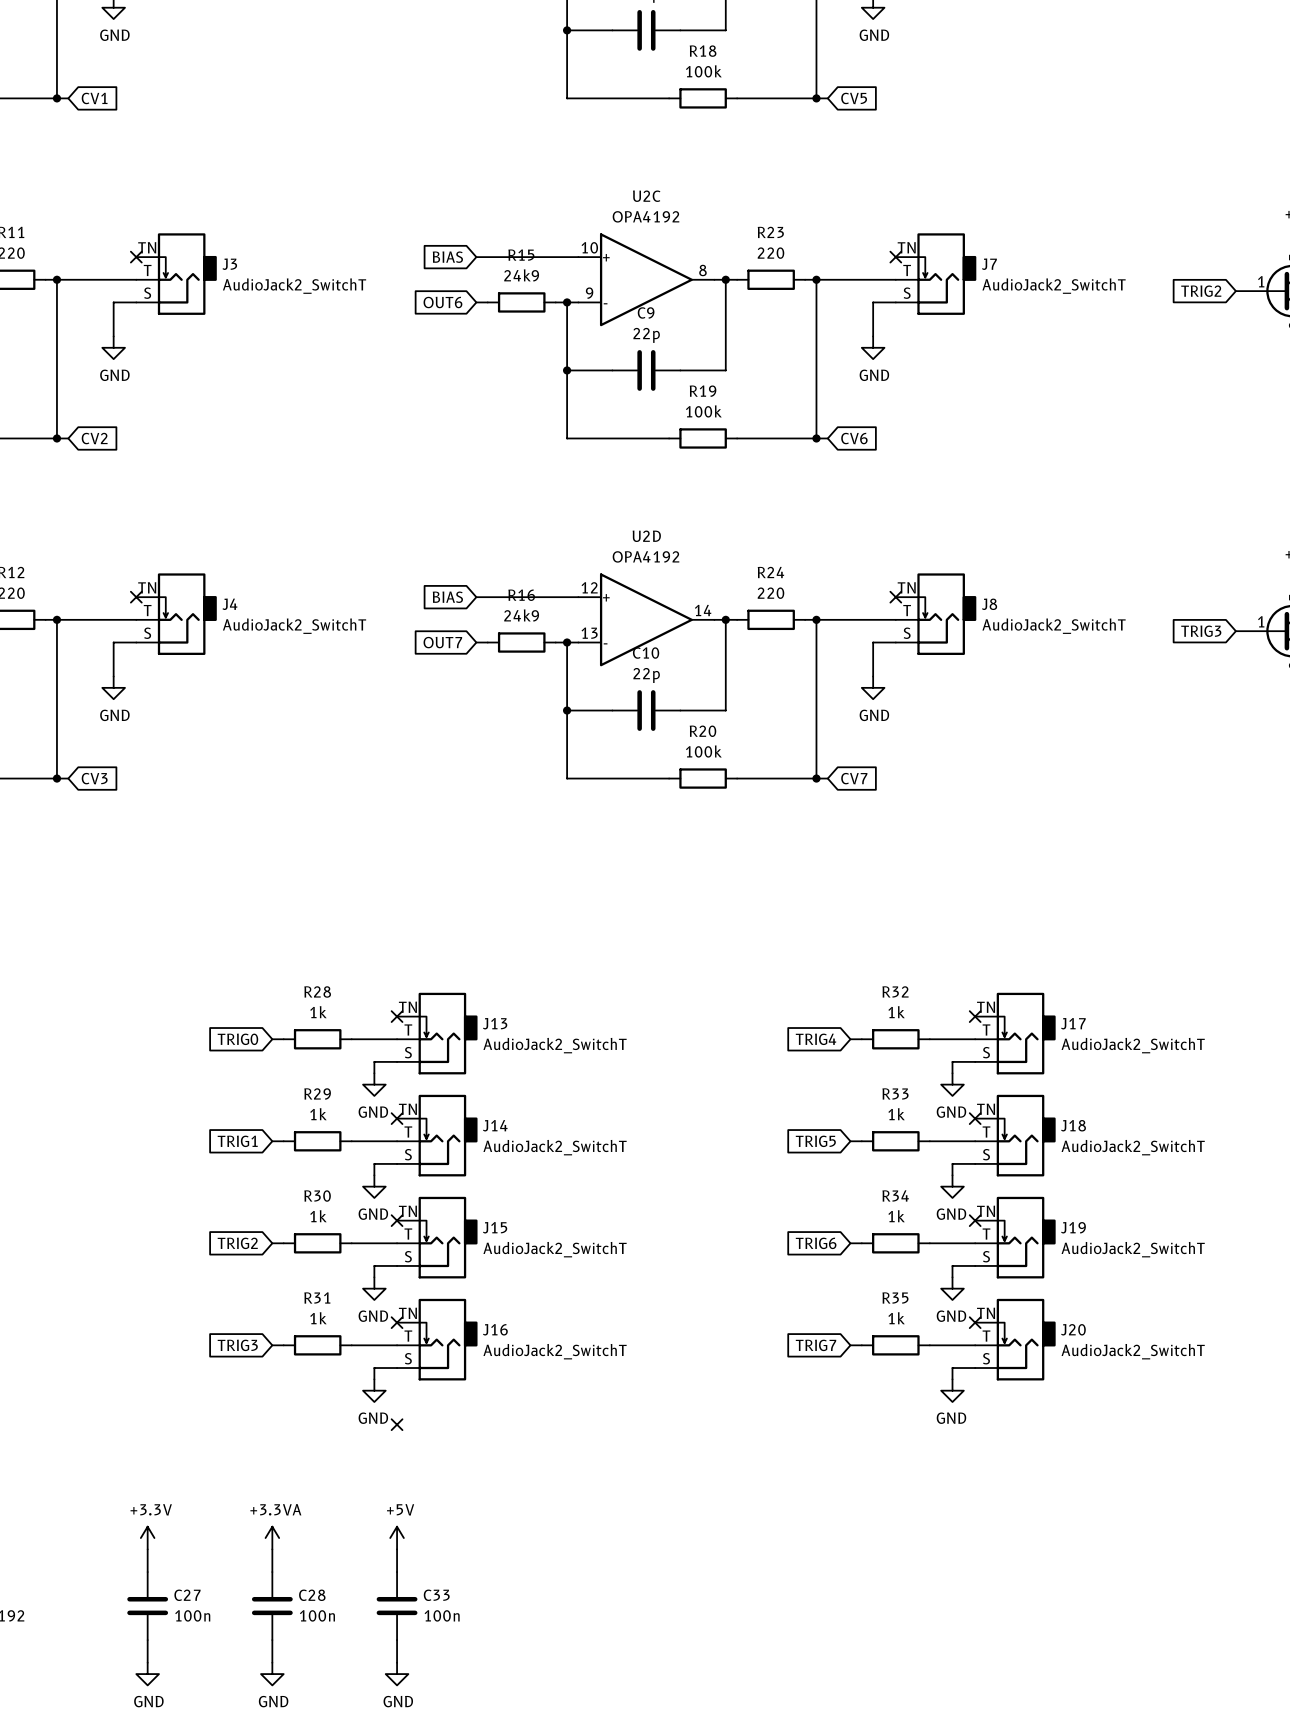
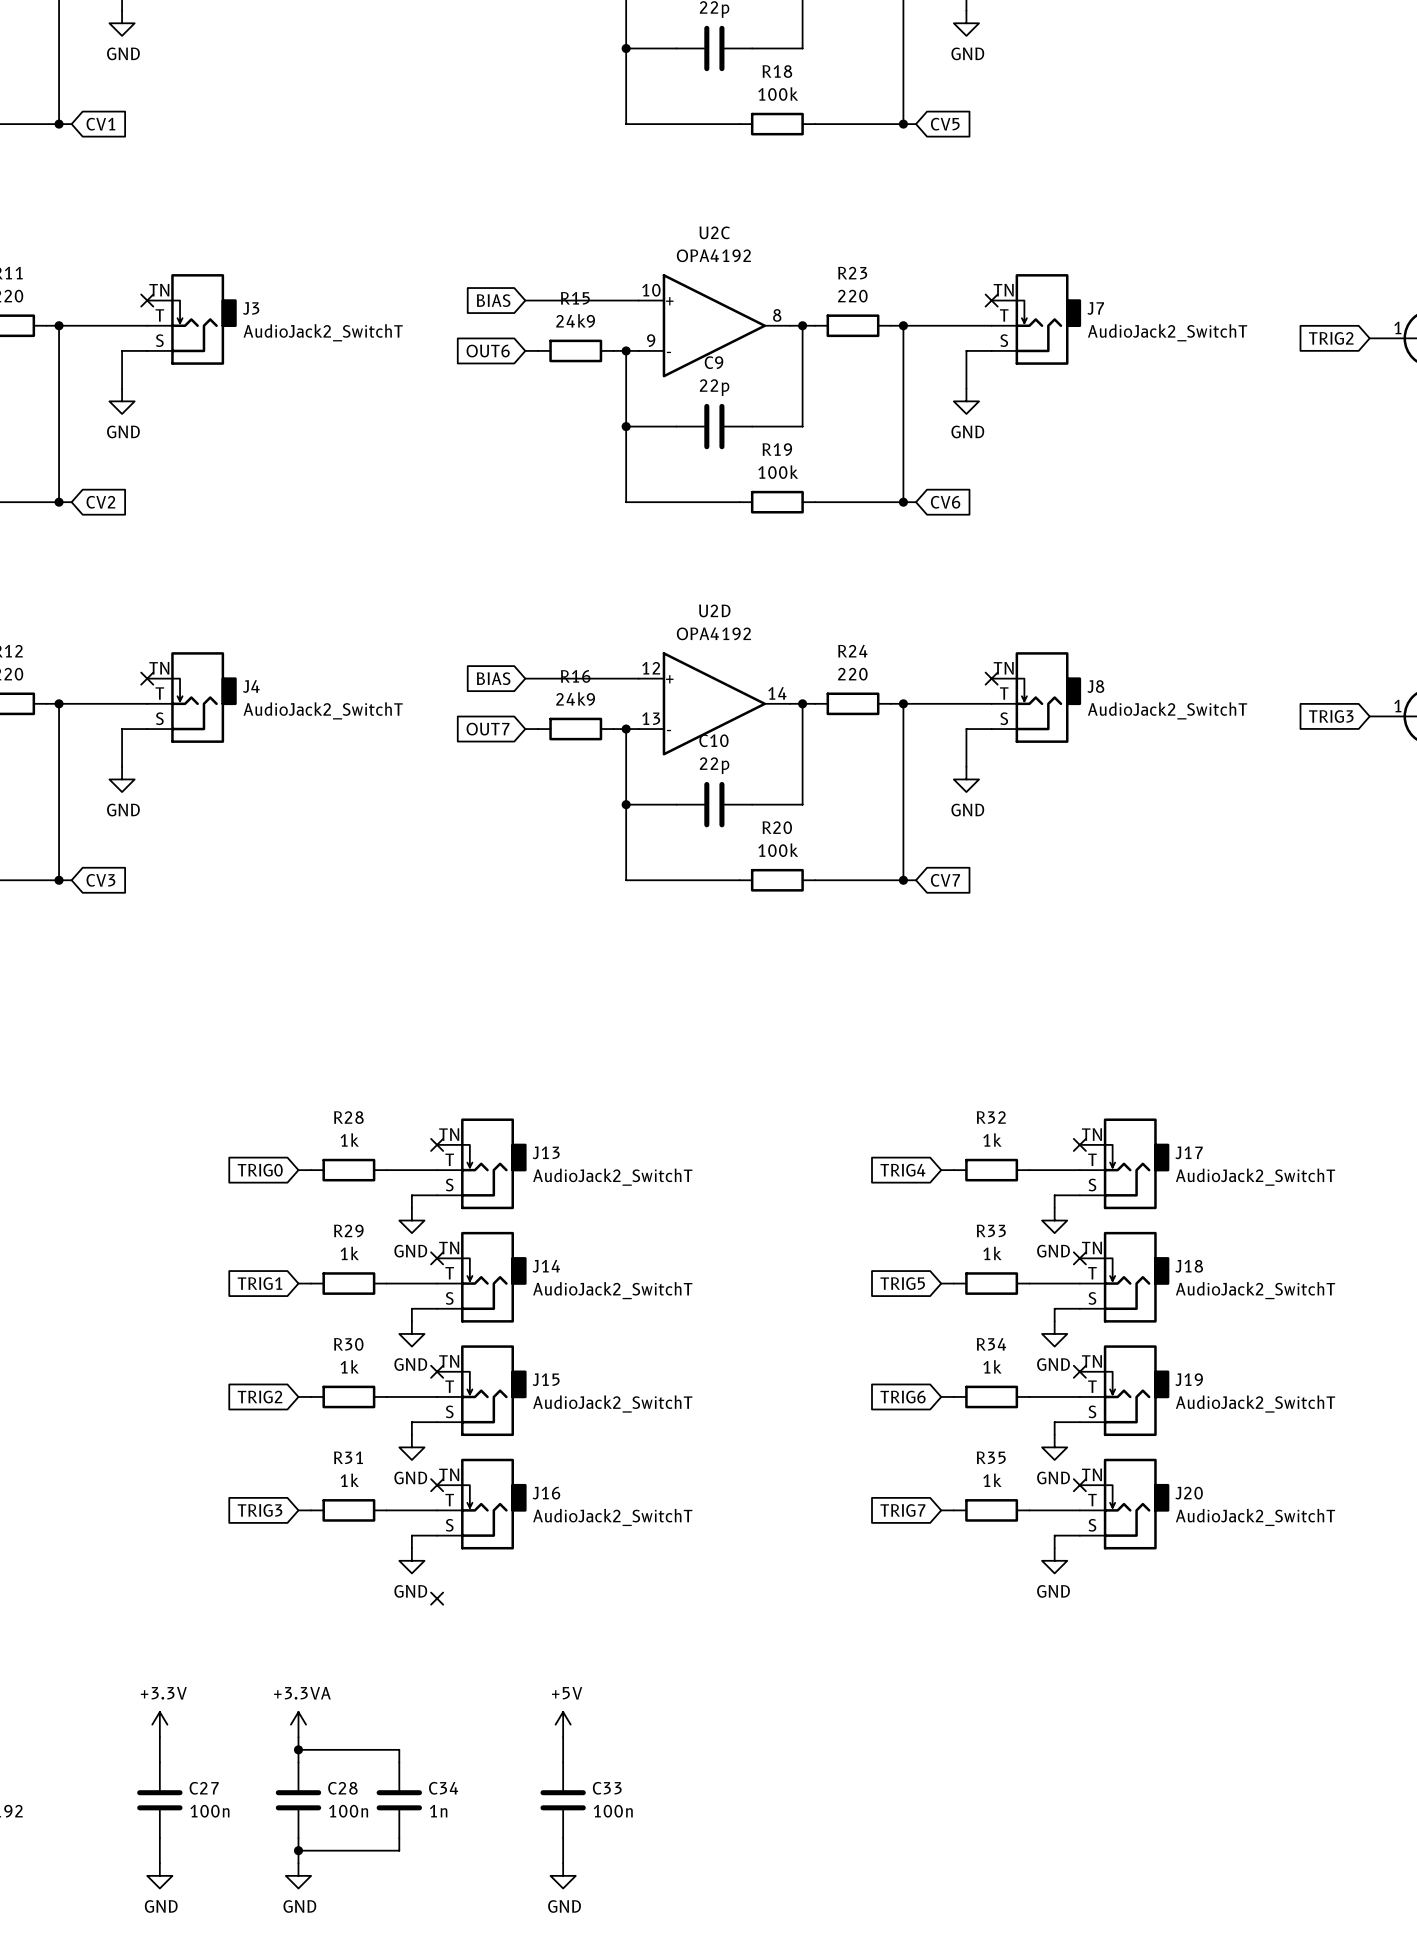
power symbol position: +5V (397, 1538) -> +5V (563, 1724)
wire: (397, 1549) (397, 1572) -> (563, 1737) (563, 1762)
wire: none -> (298, 1749) (399, 1749) (399, 1762)
junction: none -> (298, 1749)
C34: none -> 1n (399, 1800)
C33 position: (397, 1606) -> (563, 1800)
wire: none -> (399, 1838) (399, 1850) (298, 1850)
wire: (397, 1640) (397, 1662) -> (563, 1838) (563, 1863)
junction: none -> (298, 1850)
power symbol position: GND (397, 1674) -> GND (563, 1875)

